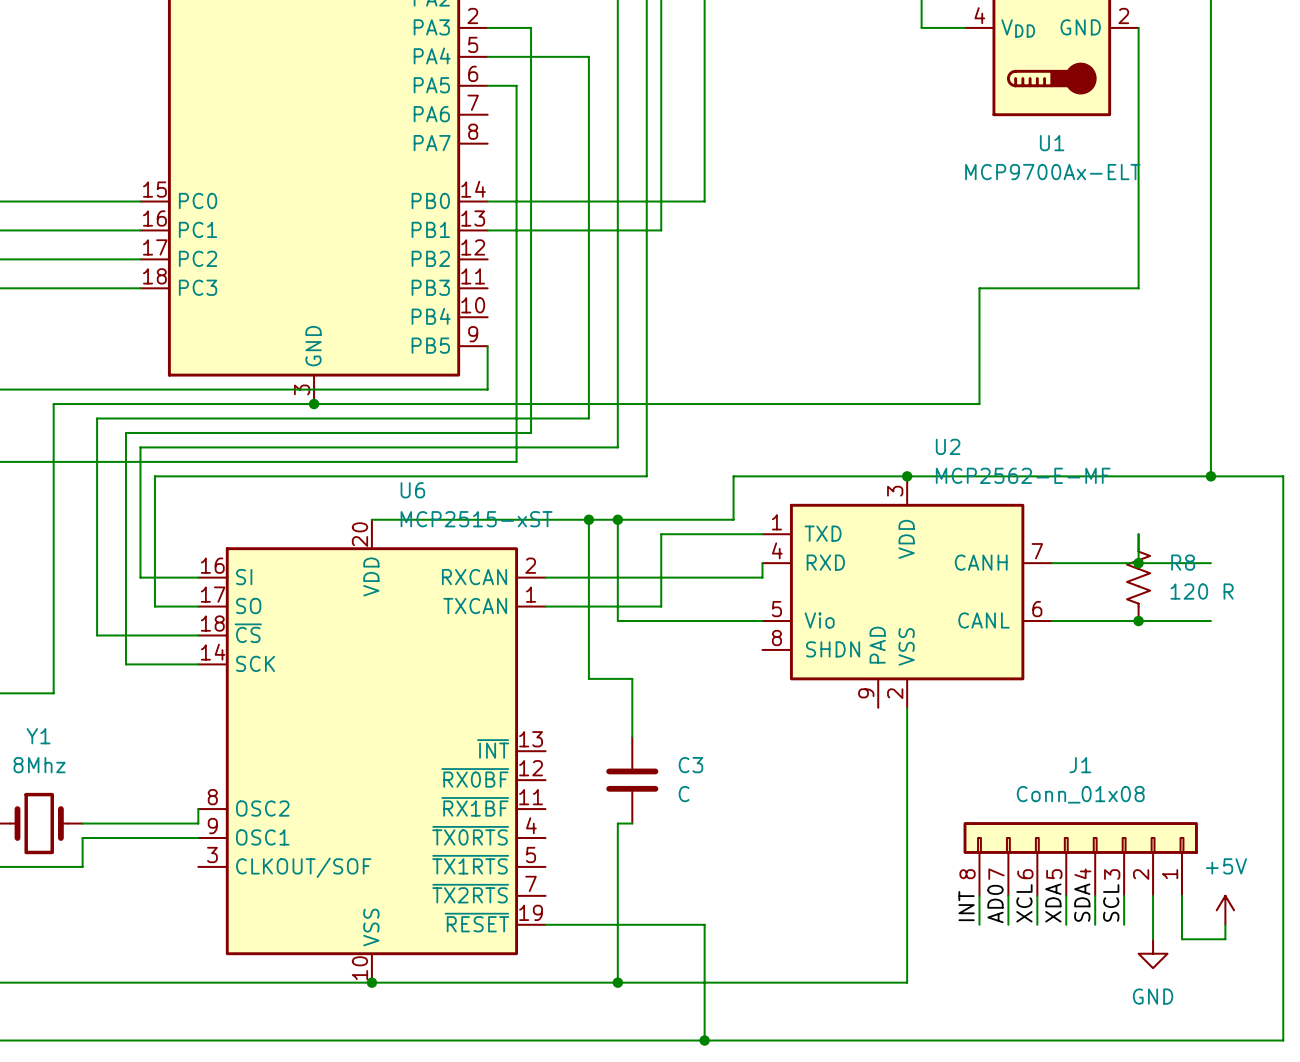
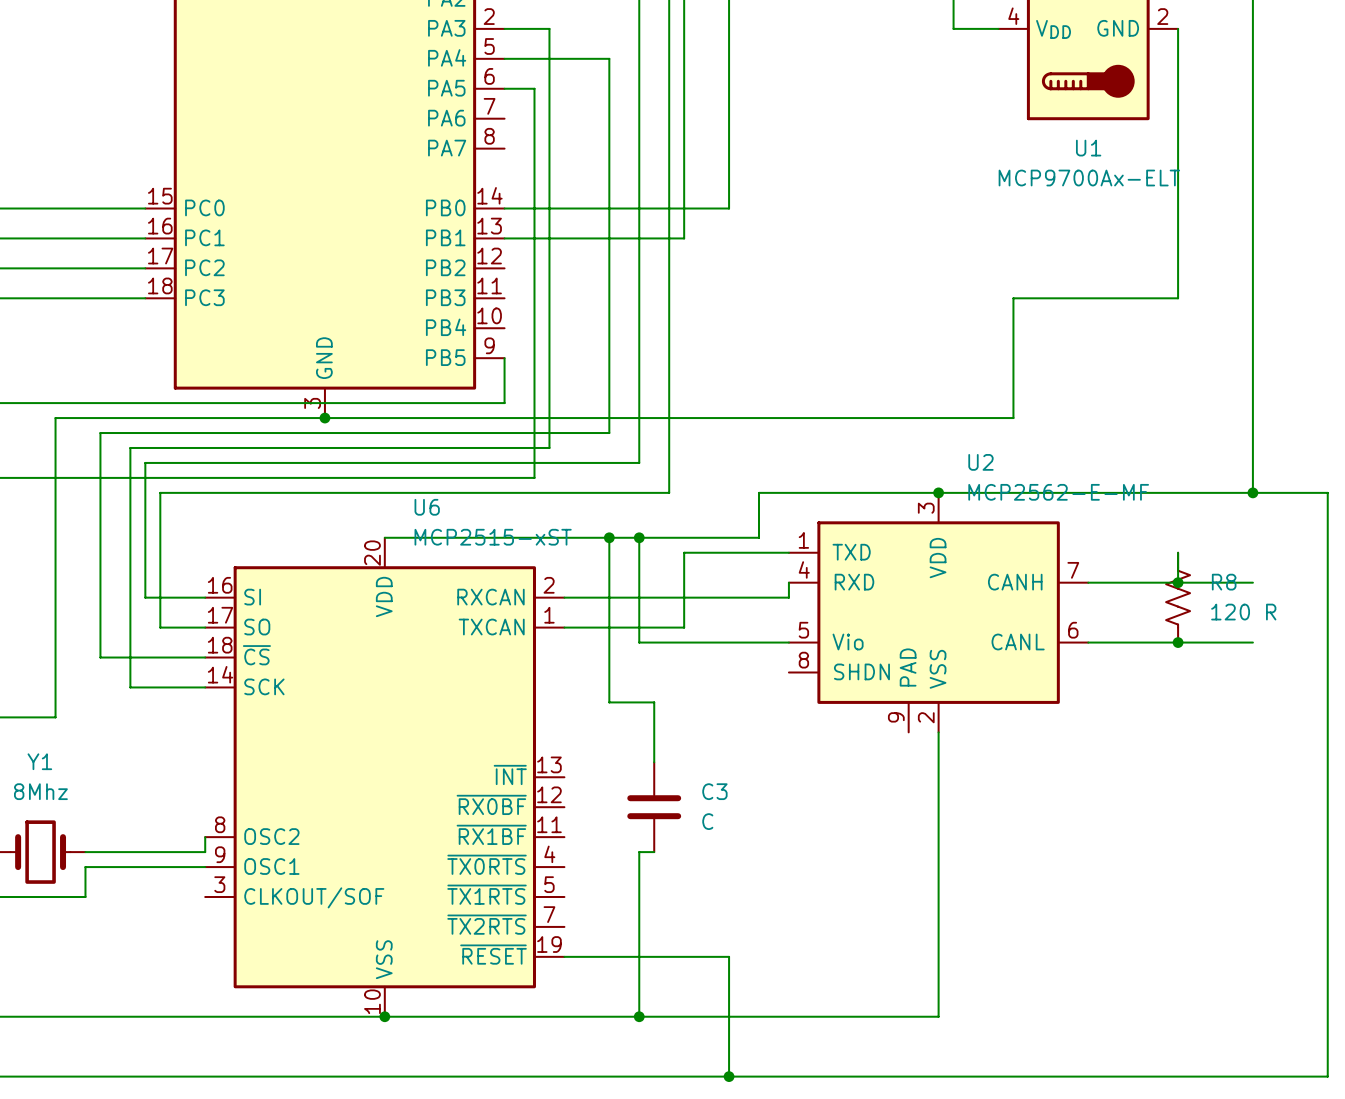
J1: Conn_01x08 (1080, 858) -> none
wire: (979, 895) (979, 924) -> none
wire: (1008, 895) (1008, 924) -> none
wire: (1037, 895) (1037, 924) -> none
wire: (1066, 895) (1066, 924) -> none
wire: (1095, 895) (1095, 924) -> none
wire: (1124, 895) (1124, 924) -> none
wire: (1153, 895) (1153, 939) -> none
wire: (1181, 895) (1181, 939) (1225, 939) (1225, 924) -> none
label: XDA (1053, 902) -> none
label: SDA (1082, 902) -> none
label: SCL (1111, 902) -> none
label: XCL (1024, 903) -> none
label: AD0 (995, 904) -> none
label: INT (966, 906) -> none
power symbol: +5V (1225, 910) -> none
power symbol: GND (1153, 953) -> none

